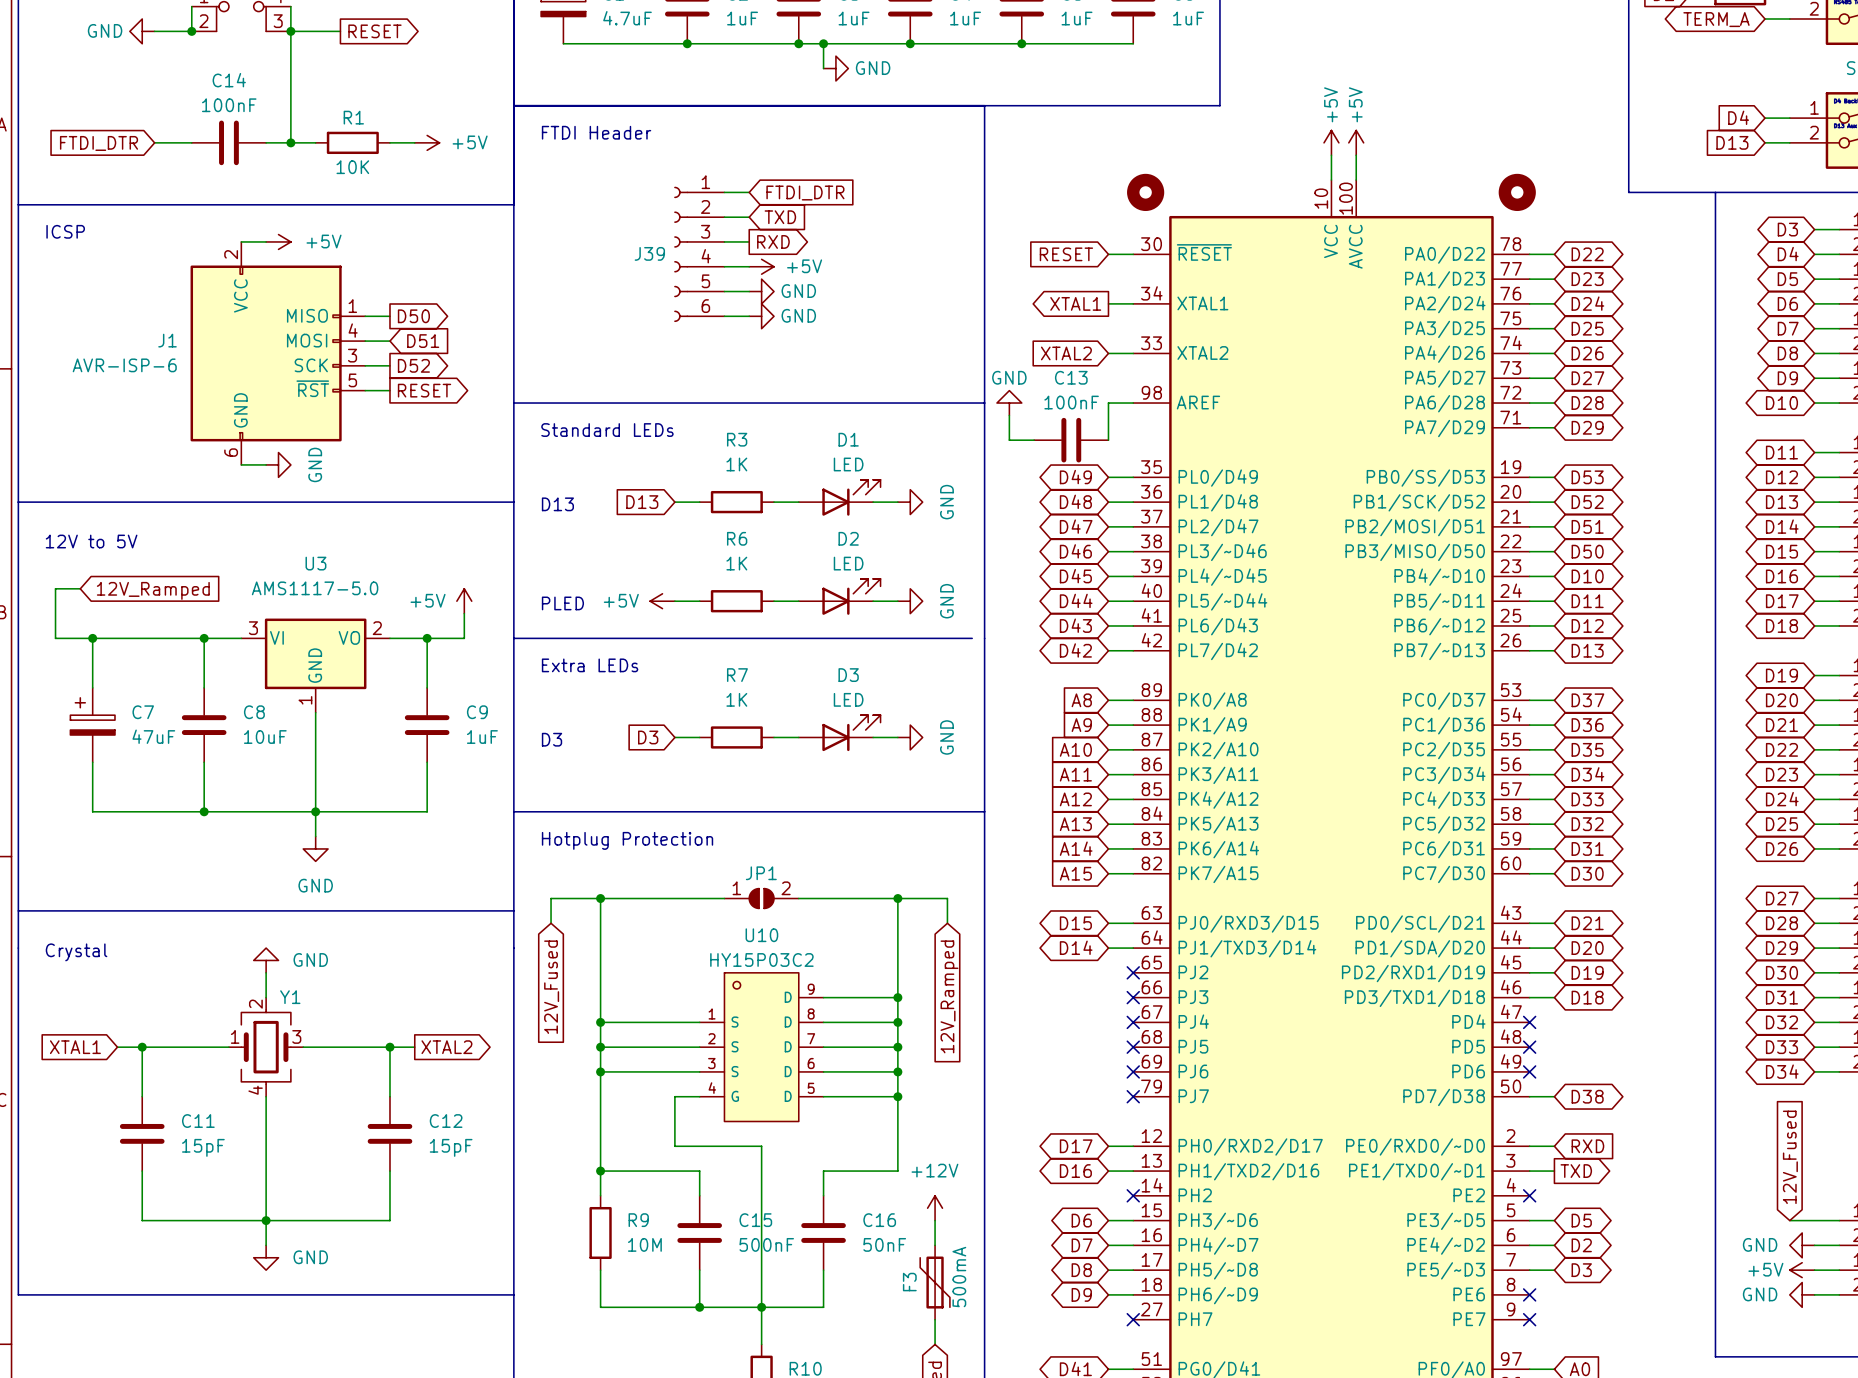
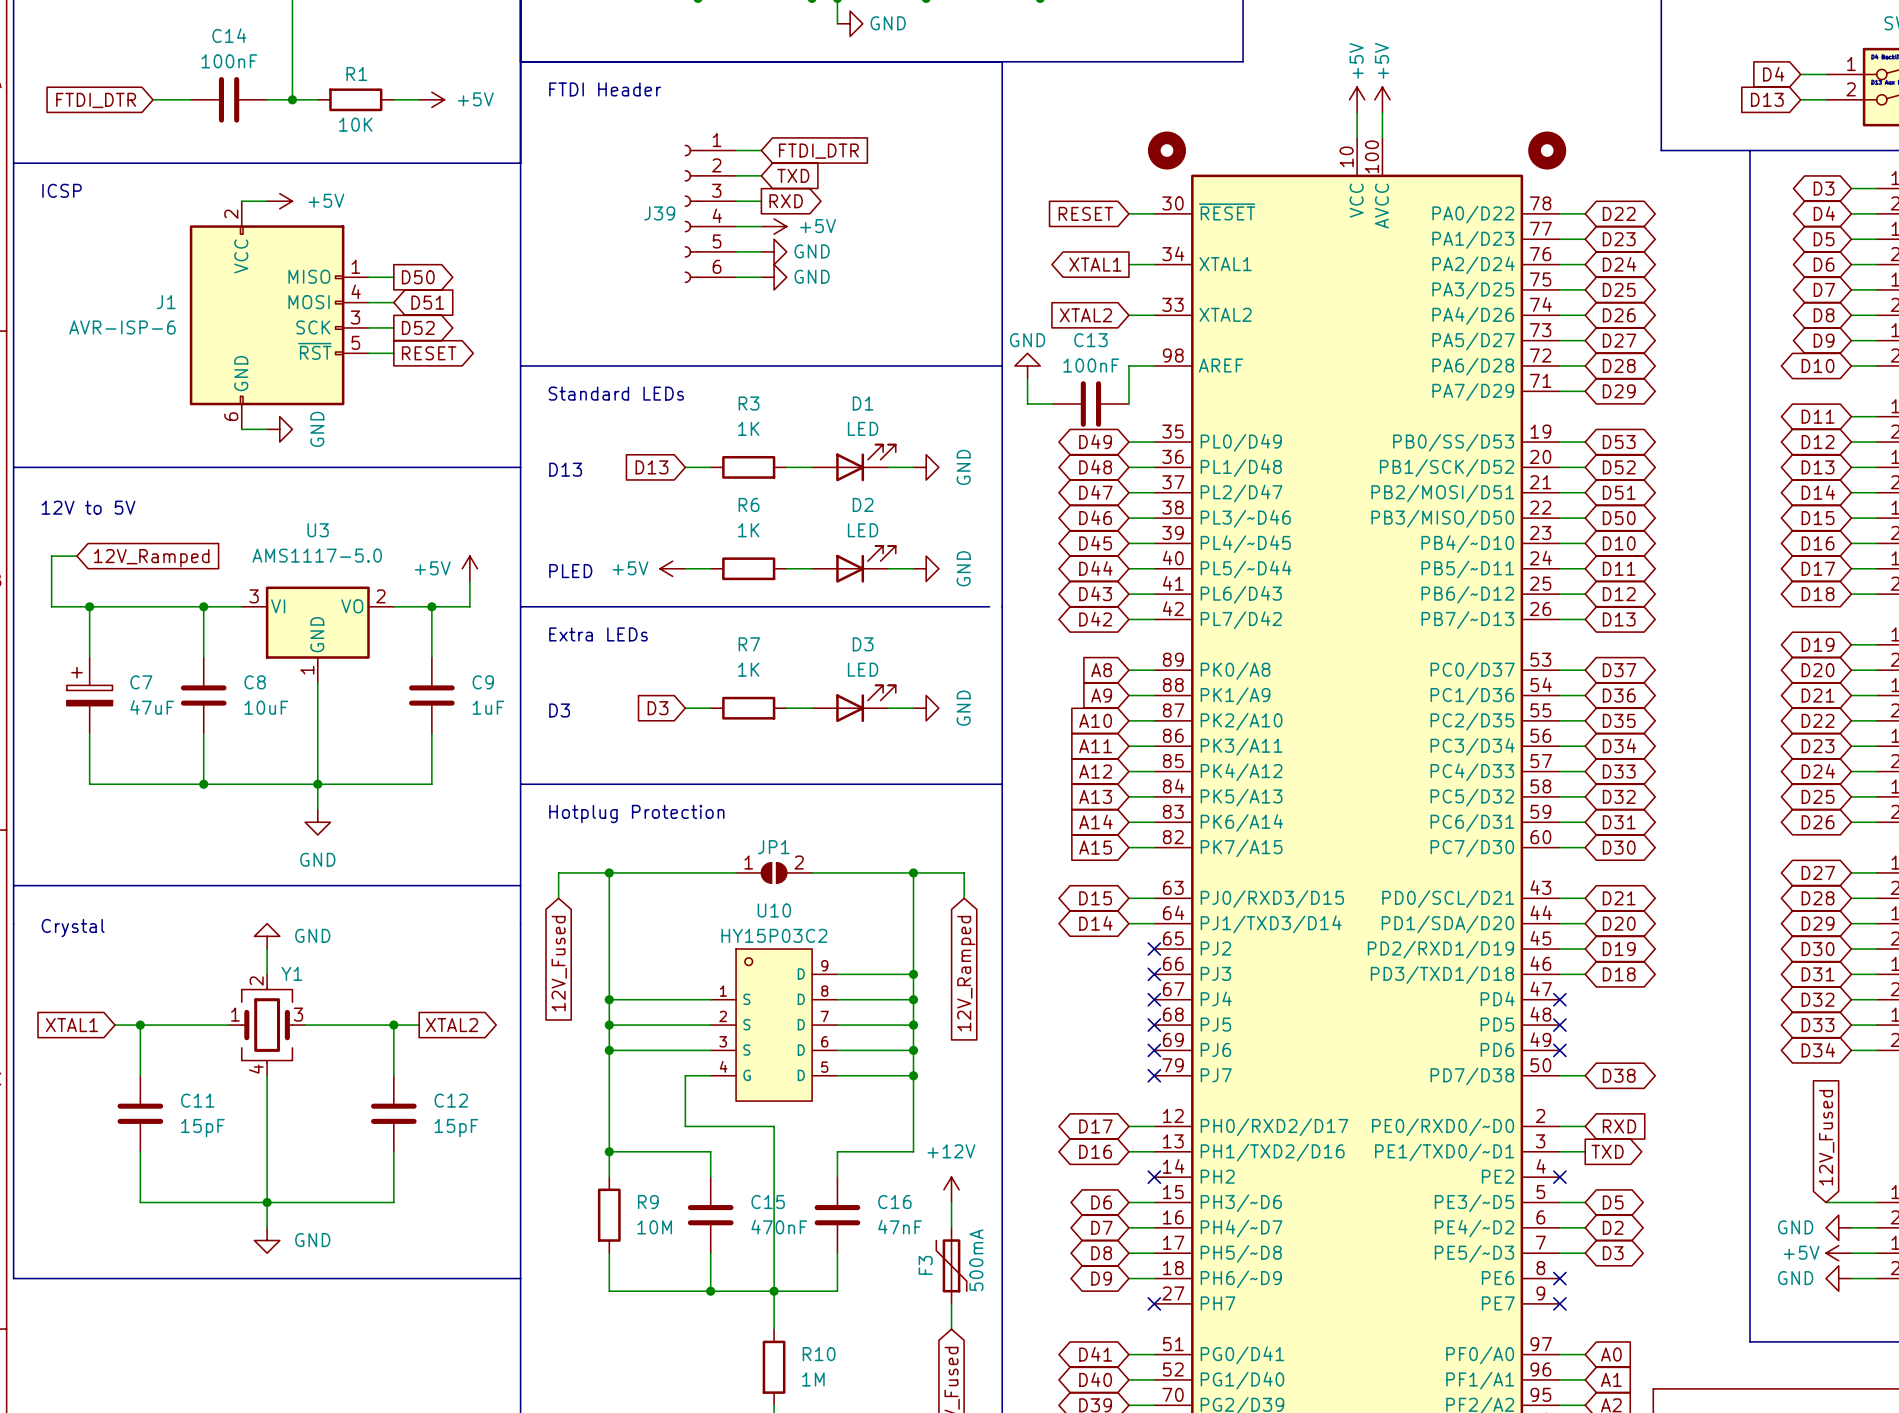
C15 value: 500nF (766, 1244) -> 470nF (779, 1227)
C16 value: 50nF (884, 1244) -> 47nF (900, 1227)

